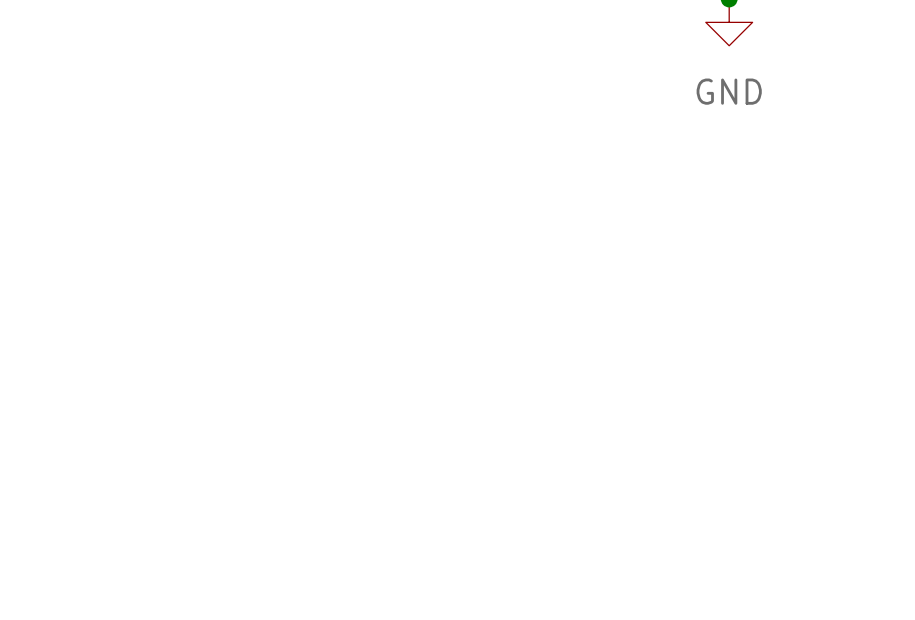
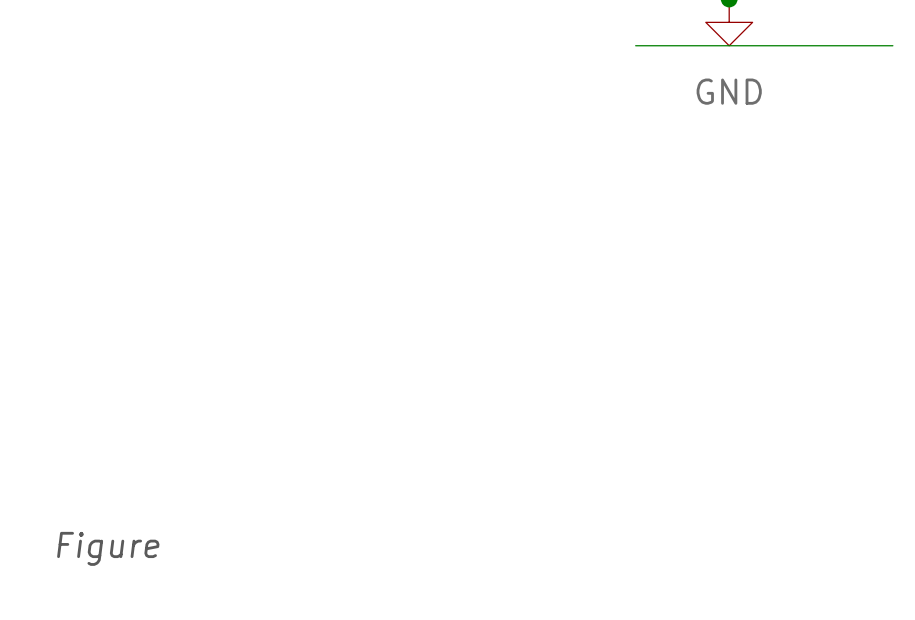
wire: none -> (635, 45) (892, 45)
text: none -> Figure (108, 548)

